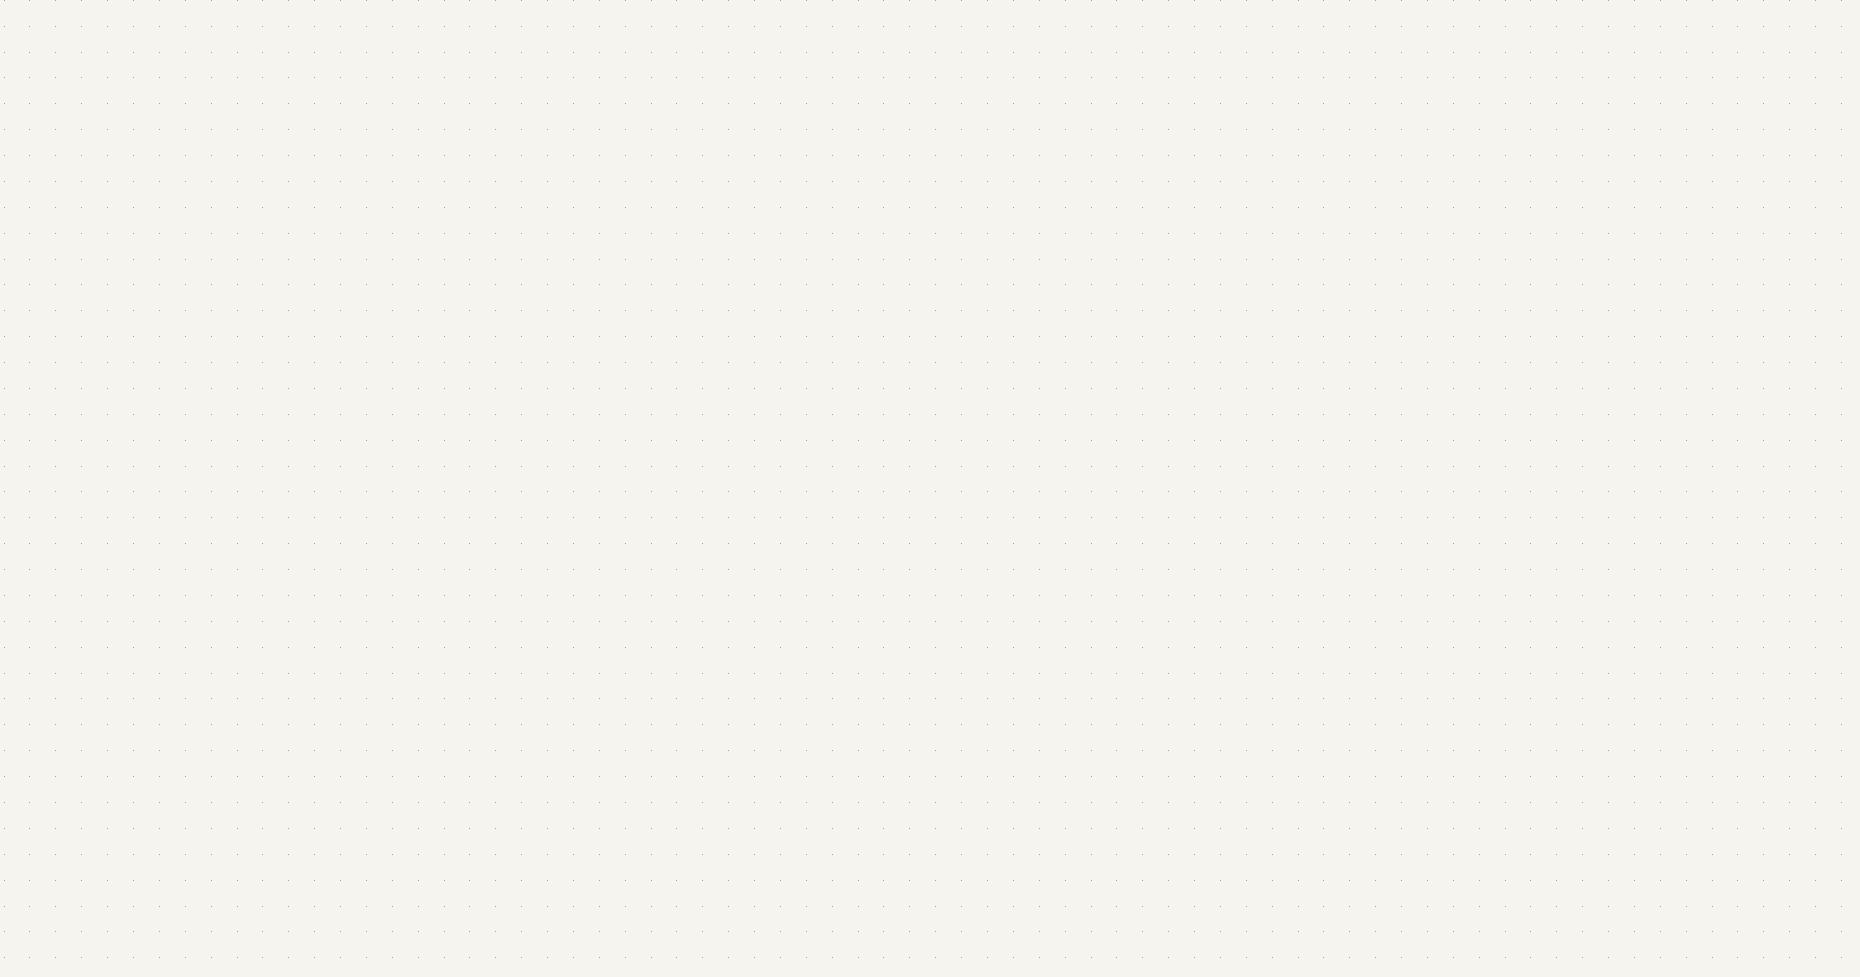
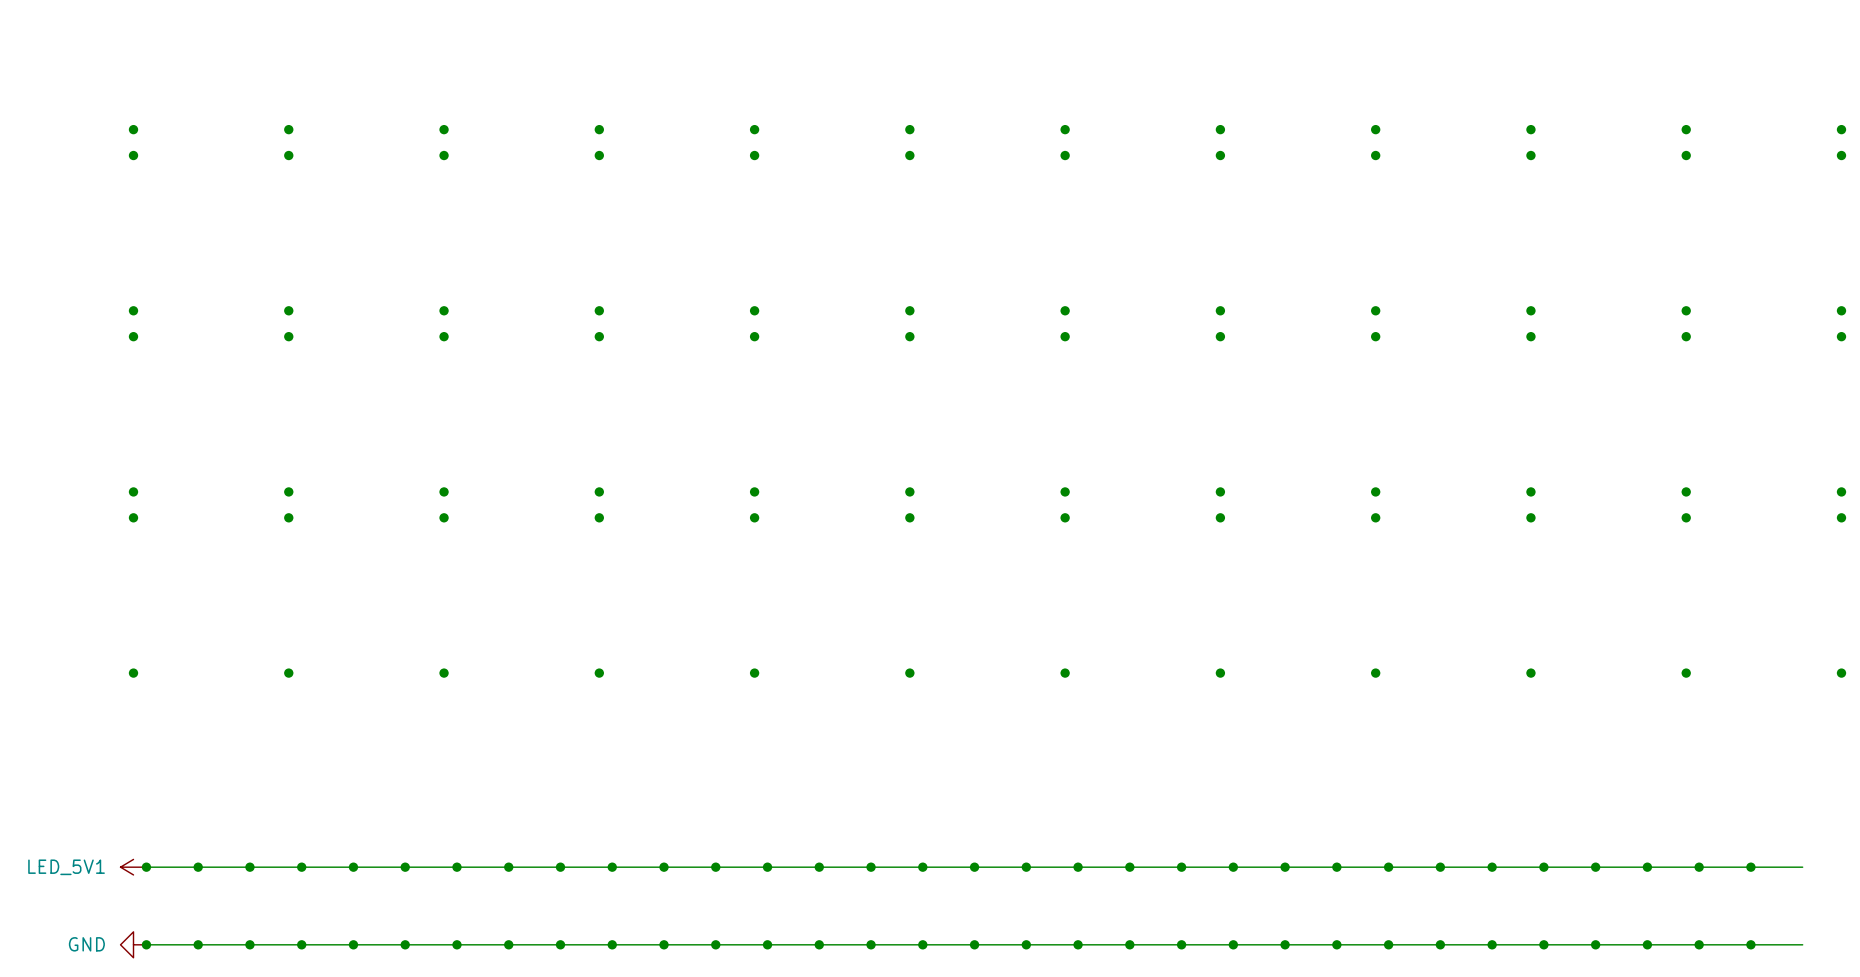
junction: none -> (133, 129)
junction: none -> (288, 129)
junction: none -> (444, 129)
junction: none -> (599, 129)
junction: none -> (754, 129)
junction: none -> (909, 129)
junction: none -> (1065, 129)
junction: none -> (1220, 129)
junction: none -> (1375, 129)
junction: none -> (1530, 129)
junction: none -> (1686, 129)
junction: none -> (1841, 129)
junction: none -> (133, 155)
junction: none -> (288, 155)
junction: none -> (444, 155)
junction: none -> (599, 155)
junction: none -> (754, 155)
junction: none -> (909, 155)
junction: none -> (1065, 155)
junction: none -> (1220, 155)
junction: none -> (1375, 155)
junction: none -> (1530, 155)
junction: none -> (1686, 155)
junction: none -> (1841, 155)
junction: none -> (133, 310)
junction: none -> (288, 310)
junction: none -> (444, 310)
junction: none -> (599, 310)
junction: none -> (754, 310)
junction: none -> (909, 310)
junction: none -> (1065, 310)
junction: none -> (1220, 310)
junction: none -> (1375, 310)
junction: none -> (1530, 310)
junction: none -> (1686, 310)
junction: none -> (1841, 310)
junction: none -> (133, 336)
junction: none -> (288, 336)
junction: none -> (444, 336)
junction: none -> (599, 336)
junction: none -> (754, 336)
junction: none -> (909, 336)
junction: none -> (1065, 336)
junction: none -> (1220, 336)
junction: none -> (1375, 336)
junction: none -> (1530, 336)
junction: none -> (1686, 336)
junction: none -> (1841, 336)
junction: none -> (133, 491)
junction: none -> (288, 491)
junction: none -> (444, 491)
junction: none -> (599, 491)
junction: none -> (754, 491)
junction: none -> (909, 491)
junction: none -> (1065, 491)
junction: none -> (1220, 491)
junction: none -> (1375, 491)
junction: none -> (1530, 491)
junction: none -> (1686, 491)
junction: none -> (1841, 491)
junction: none -> (133, 517)
junction: none -> (288, 517)
junction: none -> (444, 517)
junction: none -> (599, 517)
junction: none -> (754, 517)
junction: none -> (909, 517)
junction: none -> (1065, 517)
junction: none -> (1220, 517)
junction: none -> (1375, 517)
junction: none -> (1530, 517)
junction: none -> (1686, 517)
junction: none -> (1841, 517)
junction: none -> (133, 673)
junction: none -> (288, 673)
junction: none -> (444, 673)
junction: none -> (599, 673)
junction: none -> (754, 673)
junction: none -> (909, 673)
junction: none -> (1065, 673)
junction: none -> (1220, 673)
junction: none -> (1375, 673)
junction: none -> (1530, 673)
junction: none -> (1686, 673)
junction: none -> (1841, 673)
power symbol: none -> LED_5V1 (133, 867)
wire: none -> (146, 867) (1802, 867)
junction: none -> (146, 867)
junction: none -> (198, 867)
junction: none -> (249, 867)
junction: none -> (301, 867)
junction: none -> (353, 867)
junction: none -> (405, 867)
junction: none -> (456, 867)
junction: none -> (508, 867)
junction: none -> (560, 867)
junction: none -> (612, 867)
junction: none -> (664, 867)
junction: none -> (715, 867)
junction: none -> (767, 867)
junction: none -> (819, 867)
junction: none -> (871, 867)
junction: none -> (922, 867)
junction: none -> (974, 867)
junction: none -> (1026, 867)
junction: none -> (1078, 867)
junction: none -> (1129, 867)
junction: none -> (1181, 867)
junction: none -> (1233, 867)
junction: none -> (1285, 867)
junction: none -> (1336, 867)
junction: none -> (1388, 867)
junction: none -> (1440, 867)
junction: none -> (1492, 867)
junction: none -> (1543, 867)
junction: none -> (1595, 867)
junction: none -> (1647, 867)
junction: none -> (1699, 867)
junction: none -> (1750, 867)
power symbol: none -> GND (133, 944)
wire: none -> (146, 944) (1802, 944)
junction: none -> (146, 944)
junction: none -> (198, 944)
junction: none -> (249, 944)
junction: none -> (301, 944)
junction: none -> (353, 944)
junction: none -> (405, 944)
junction: none -> (456, 944)
junction: none -> (508, 944)
junction: none -> (560, 944)
junction: none -> (612, 944)
junction: none -> (664, 944)
junction: none -> (715, 944)
junction: none -> (767, 944)
junction: none -> (819, 944)
junction: none -> (871, 944)
junction: none -> (922, 944)
junction: none -> (974, 944)
junction: none -> (1026, 944)
junction: none -> (1078, 944)
junction: none -> (1129, 944)
junction: none -> (1181, 944)
junction: none -> (1233, 944)
junction: none -> (1285, 944)
junction: none -> (1336, 944)
junction: none -> (1388, 944)
junction: none -> (1440, 944)
junction: none -> (1492, 944)
junction: none -> (1543, 944)
junction: none -> (1595, 944)
junction: none -> (1647, 944)
junction: none -> (1699, 944)
junction: none -> (1750, 944)

